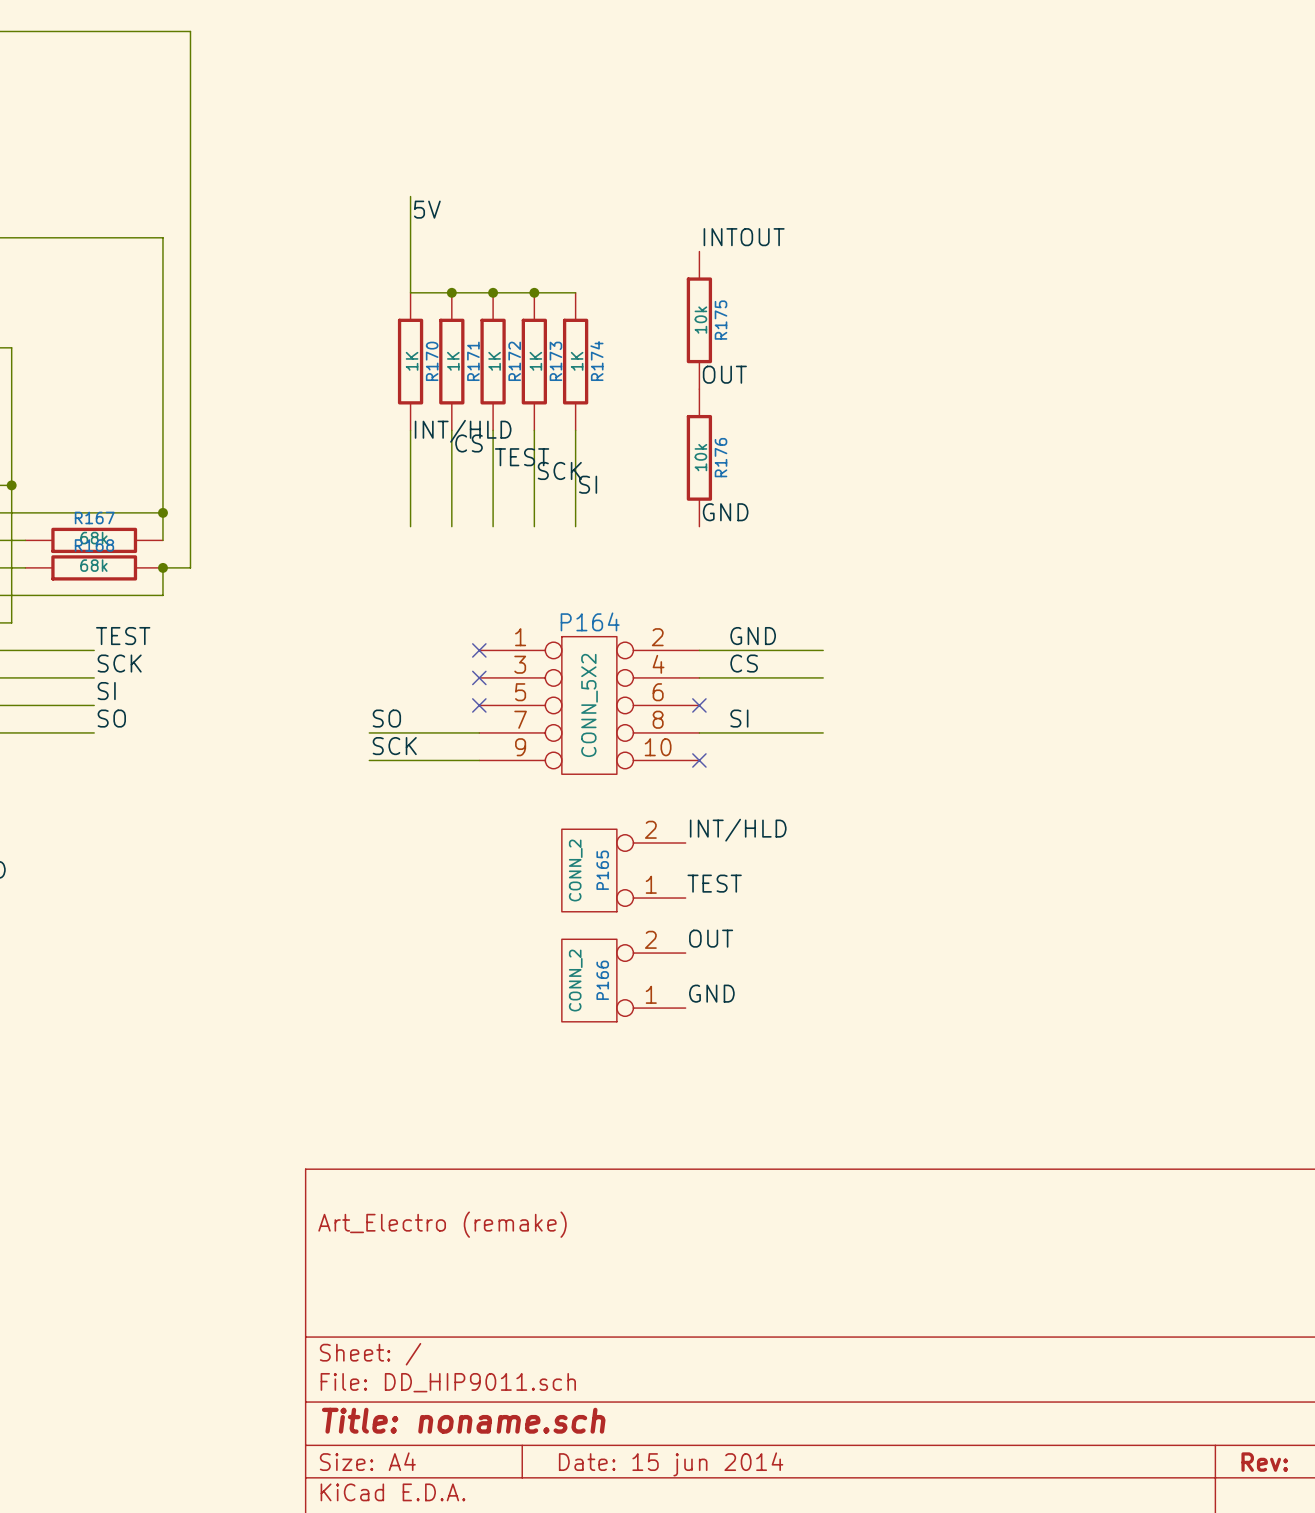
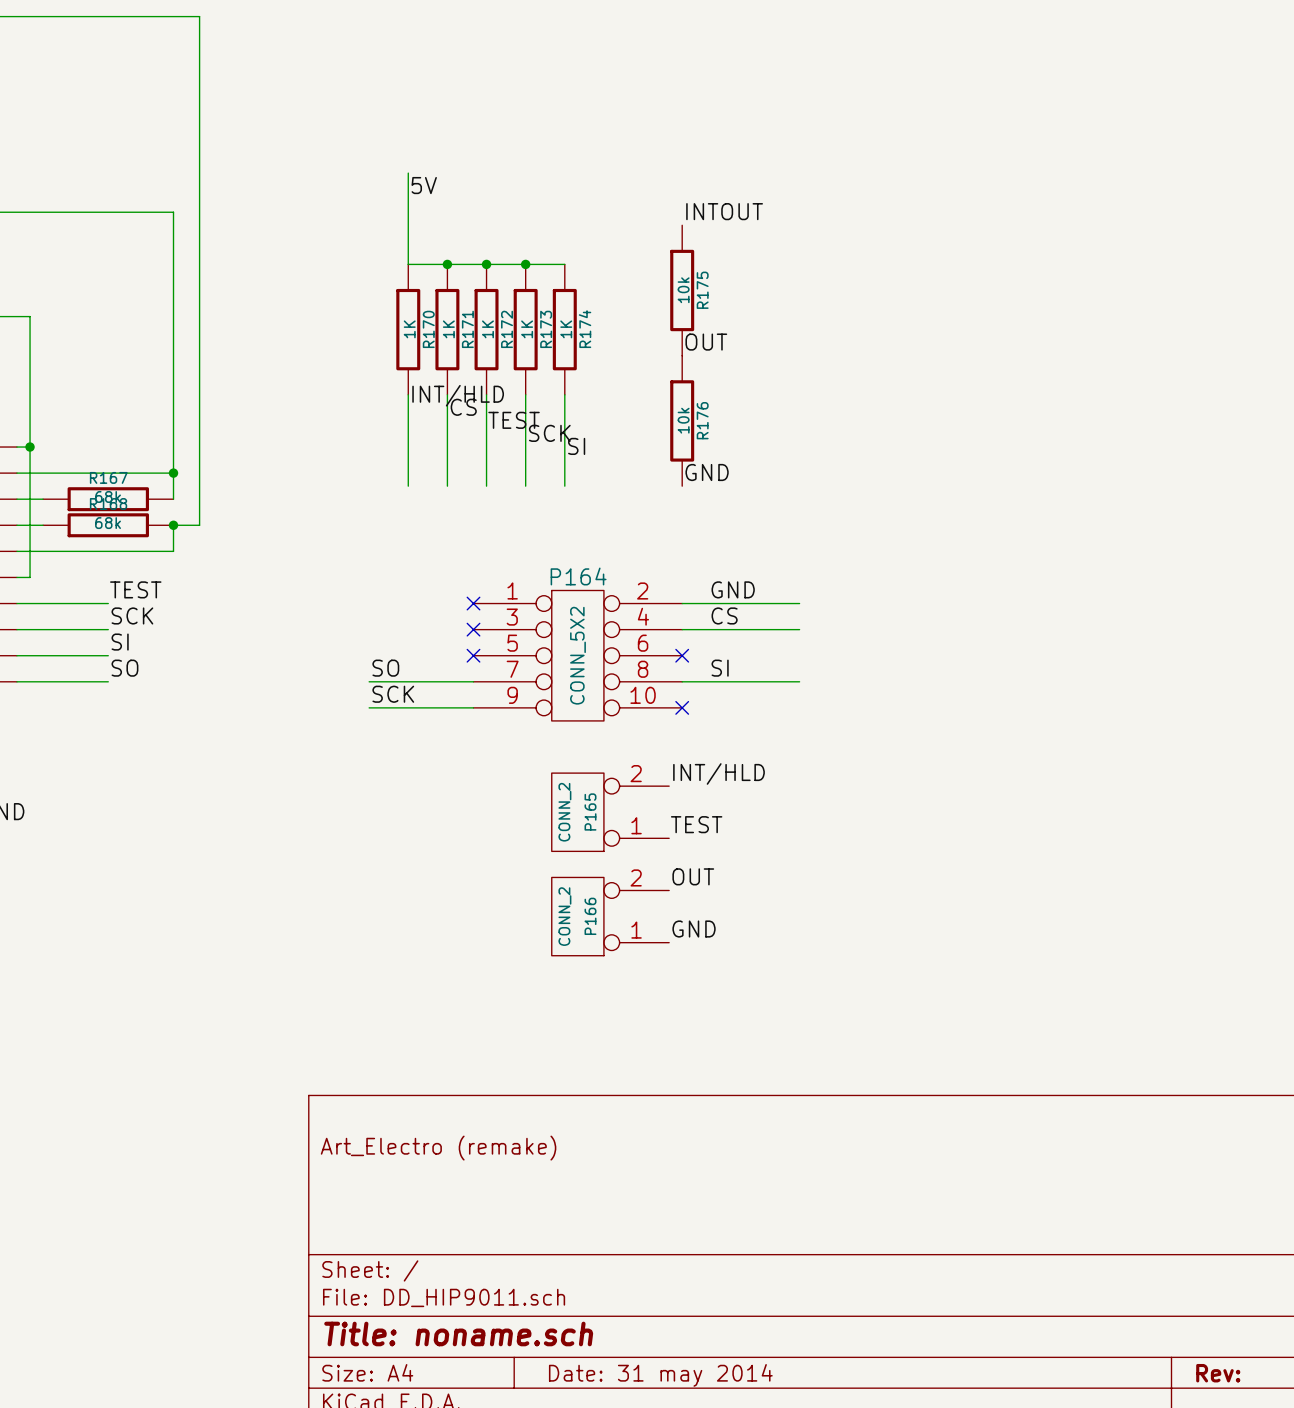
title block: Date: 15 jun 2014 (671, 1464) -> Date: 31 may 2014 (660, 1375)

